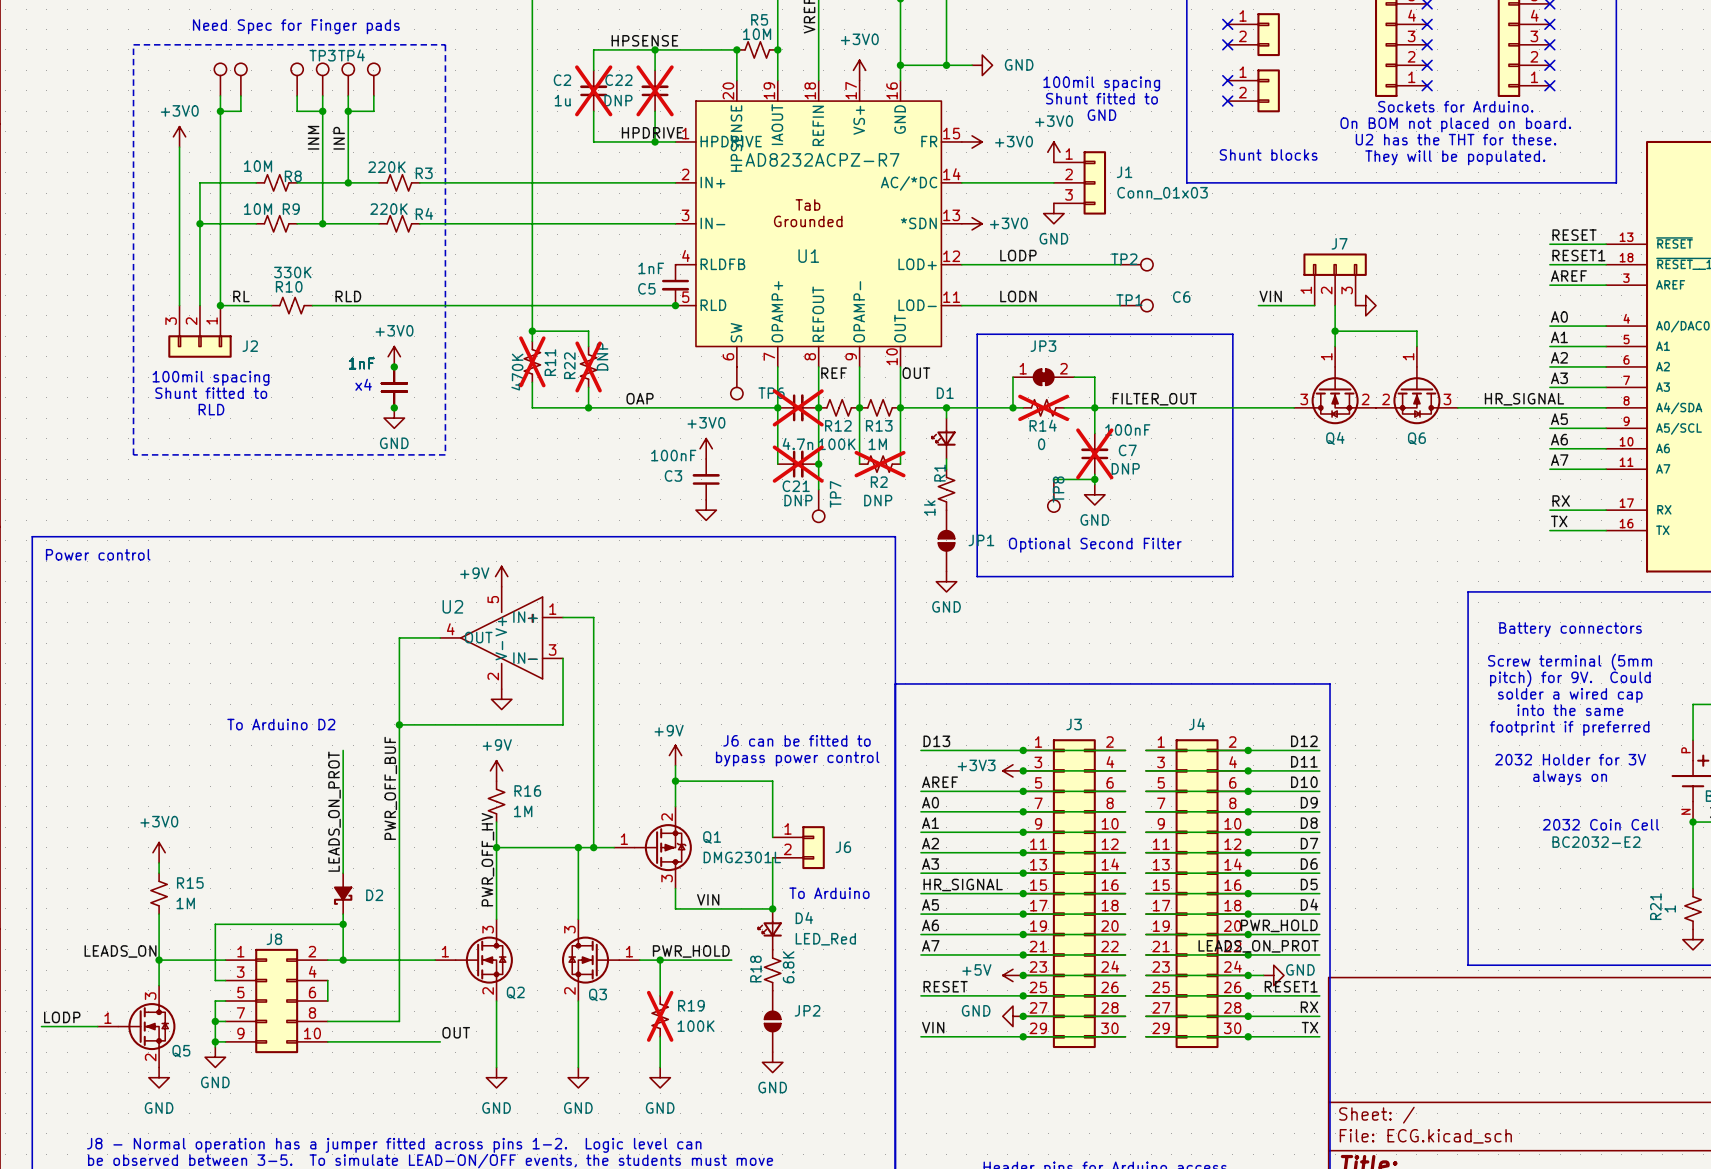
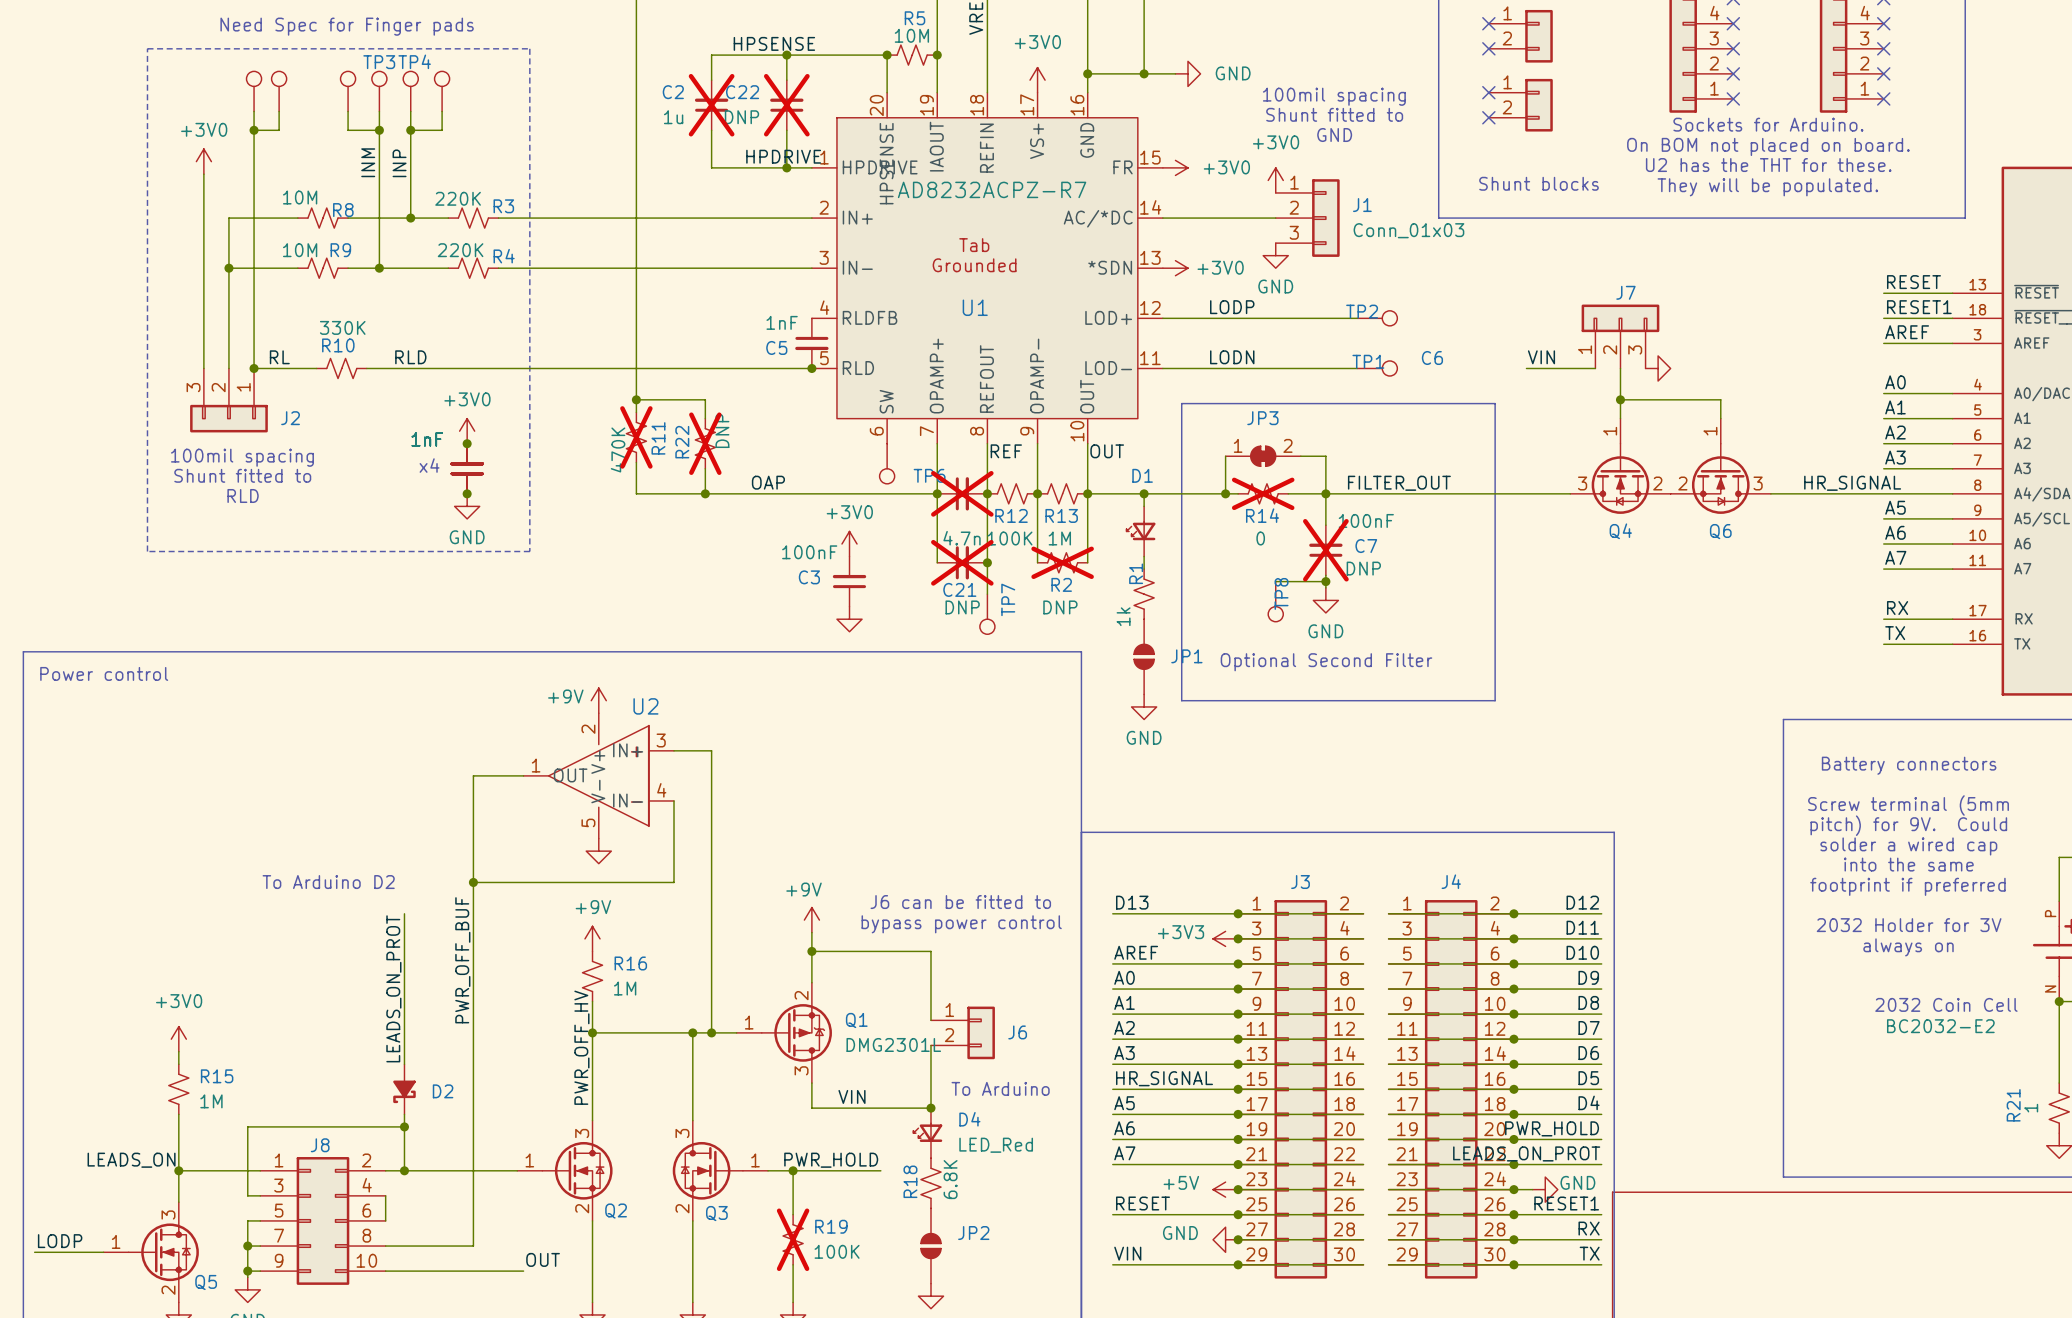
U2 pin number: 5 (493, 599) -> 2 (588, 729)
U2 name position: U2 (452, 606) -> U2 (645, 706)
U2 pin number: 1 (552, 609) -> 3 (661, 740)
U2 pin number: 4 (450, 629) -> 1 (536, 765)
U2 pin number: 3 (552, 649) -> 4 (661, 790)
U2 pin number: 2 (493, 676) -> 5 (588, 822)

